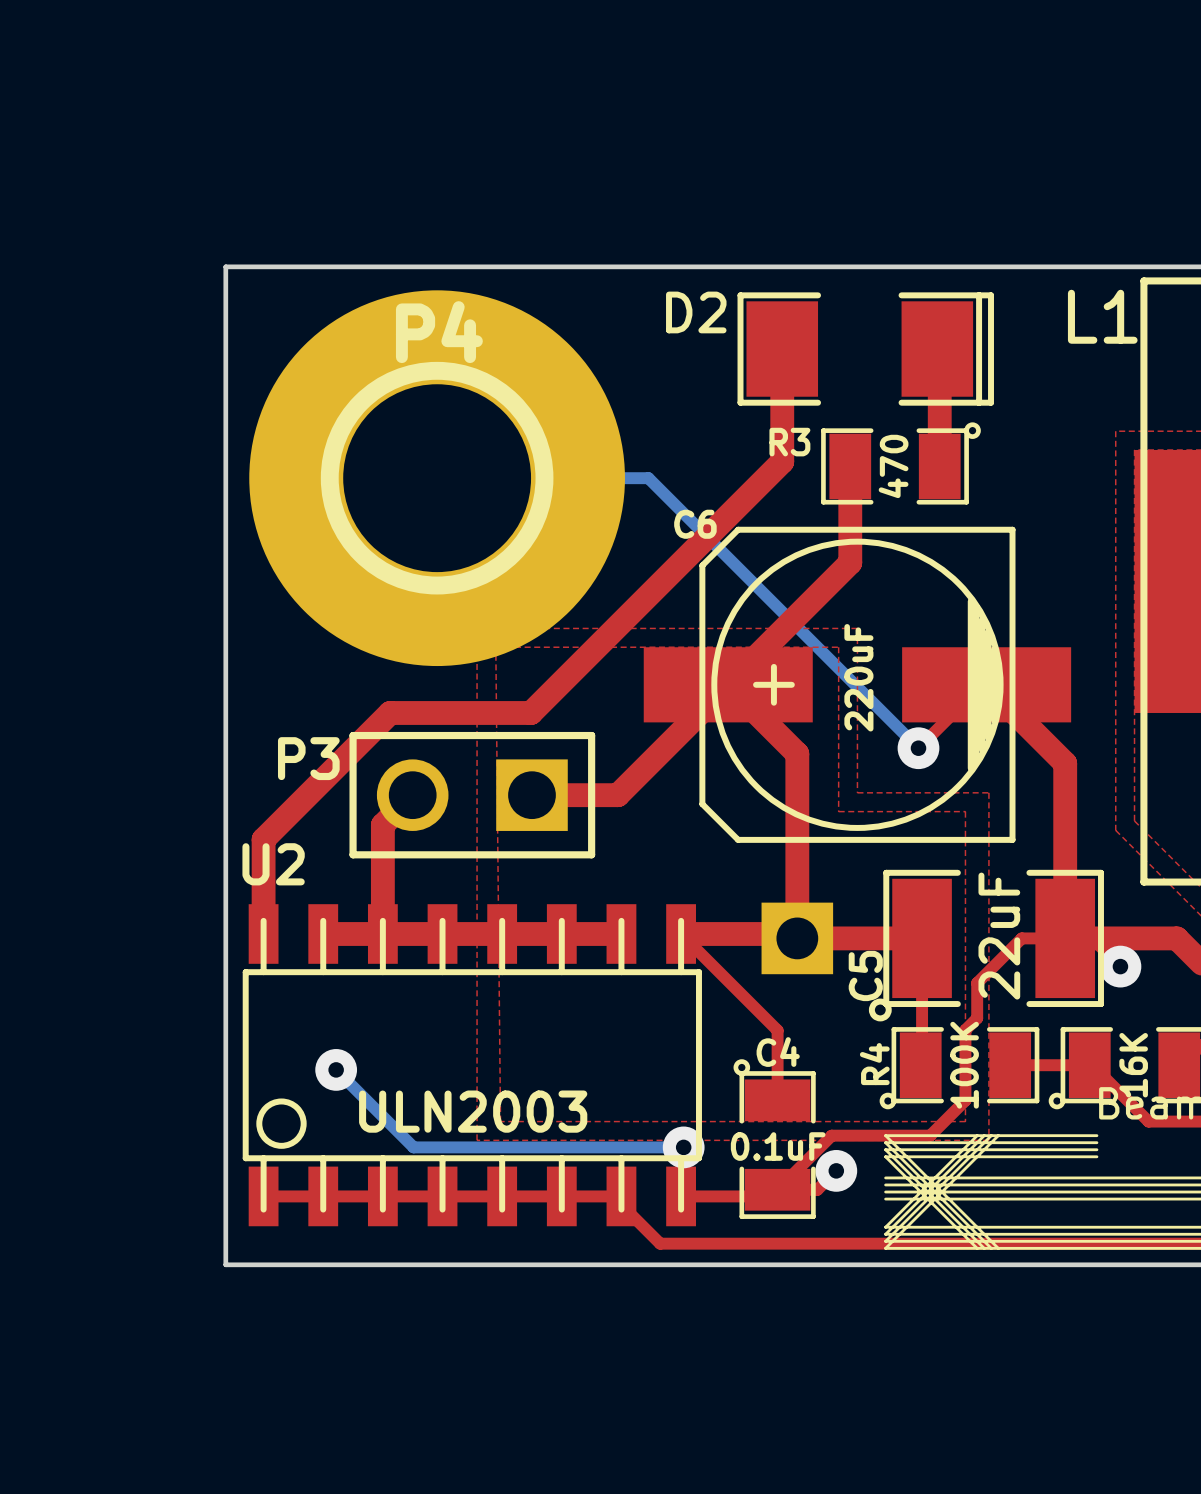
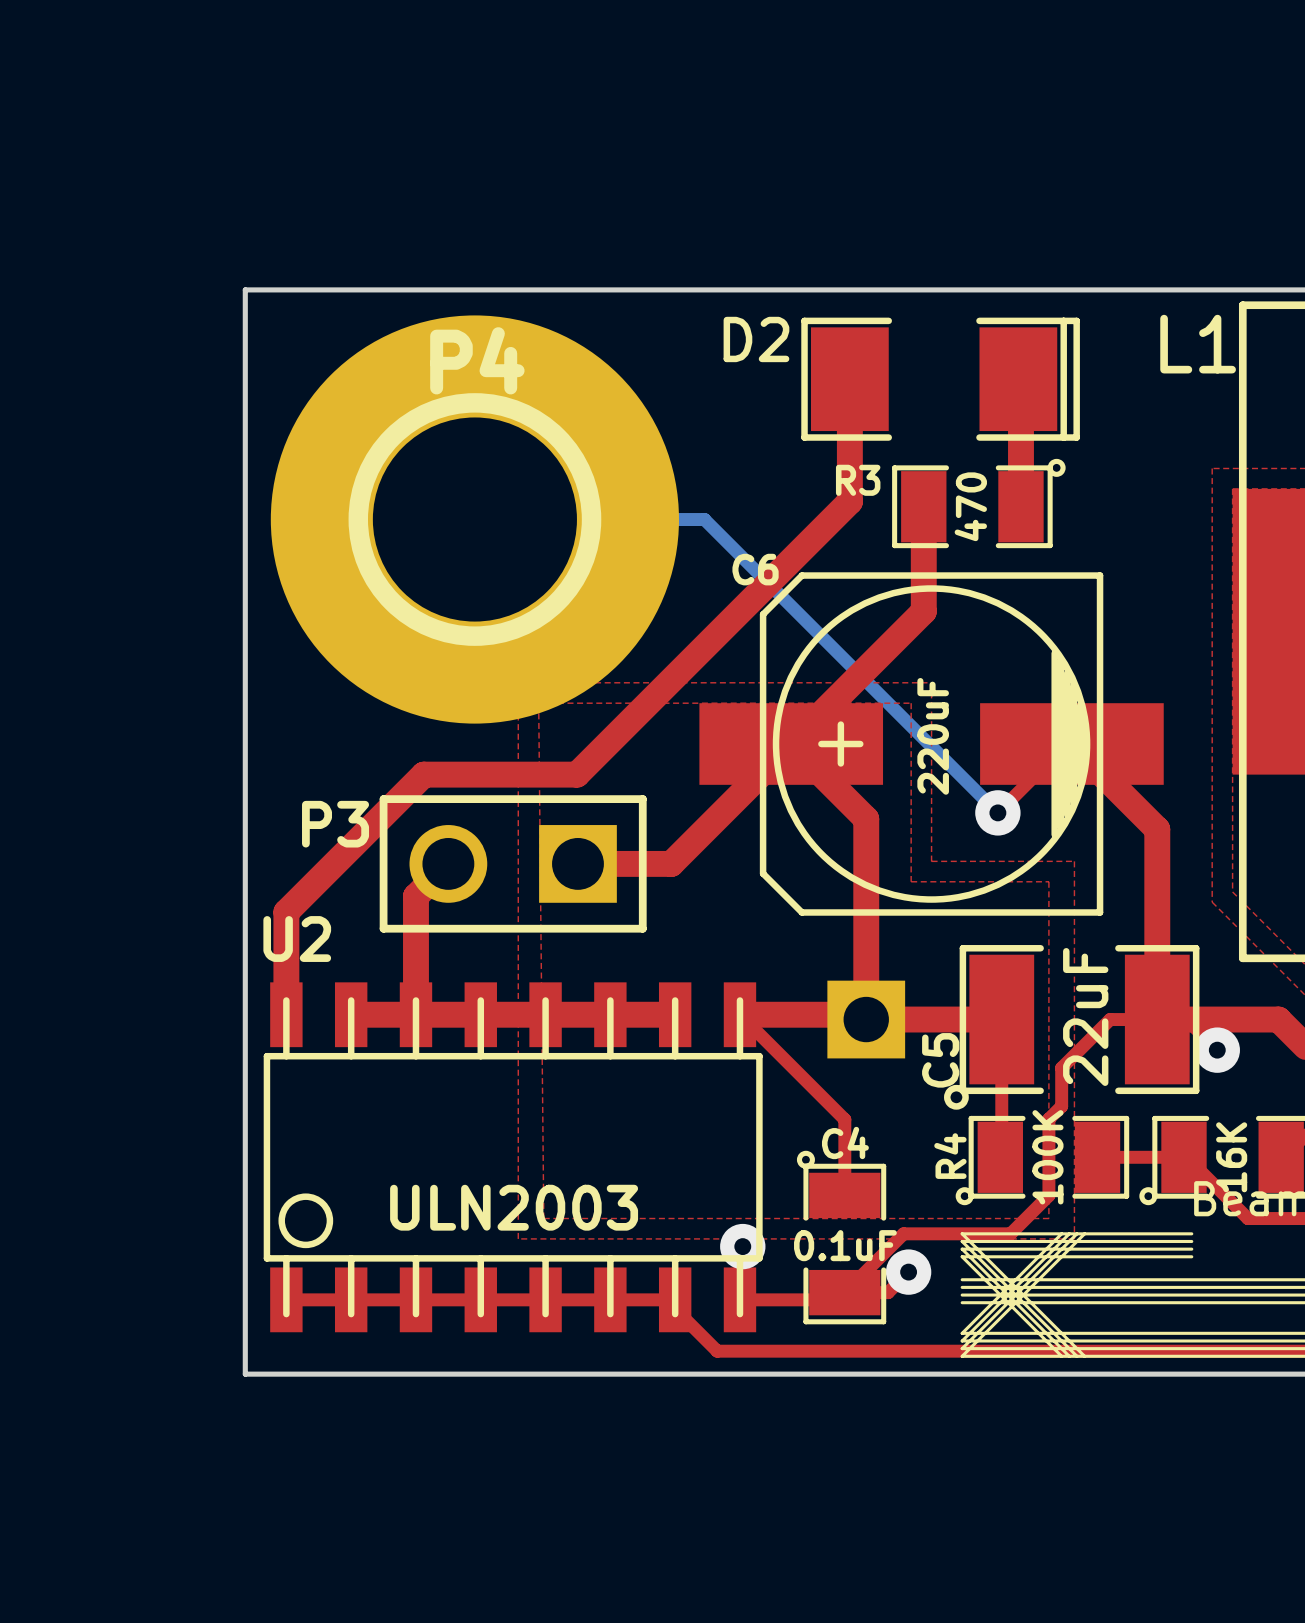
bottom track: (336, 1069) (413, 1147) (683, 1147) -> none
via: (336, 1069) -> none

